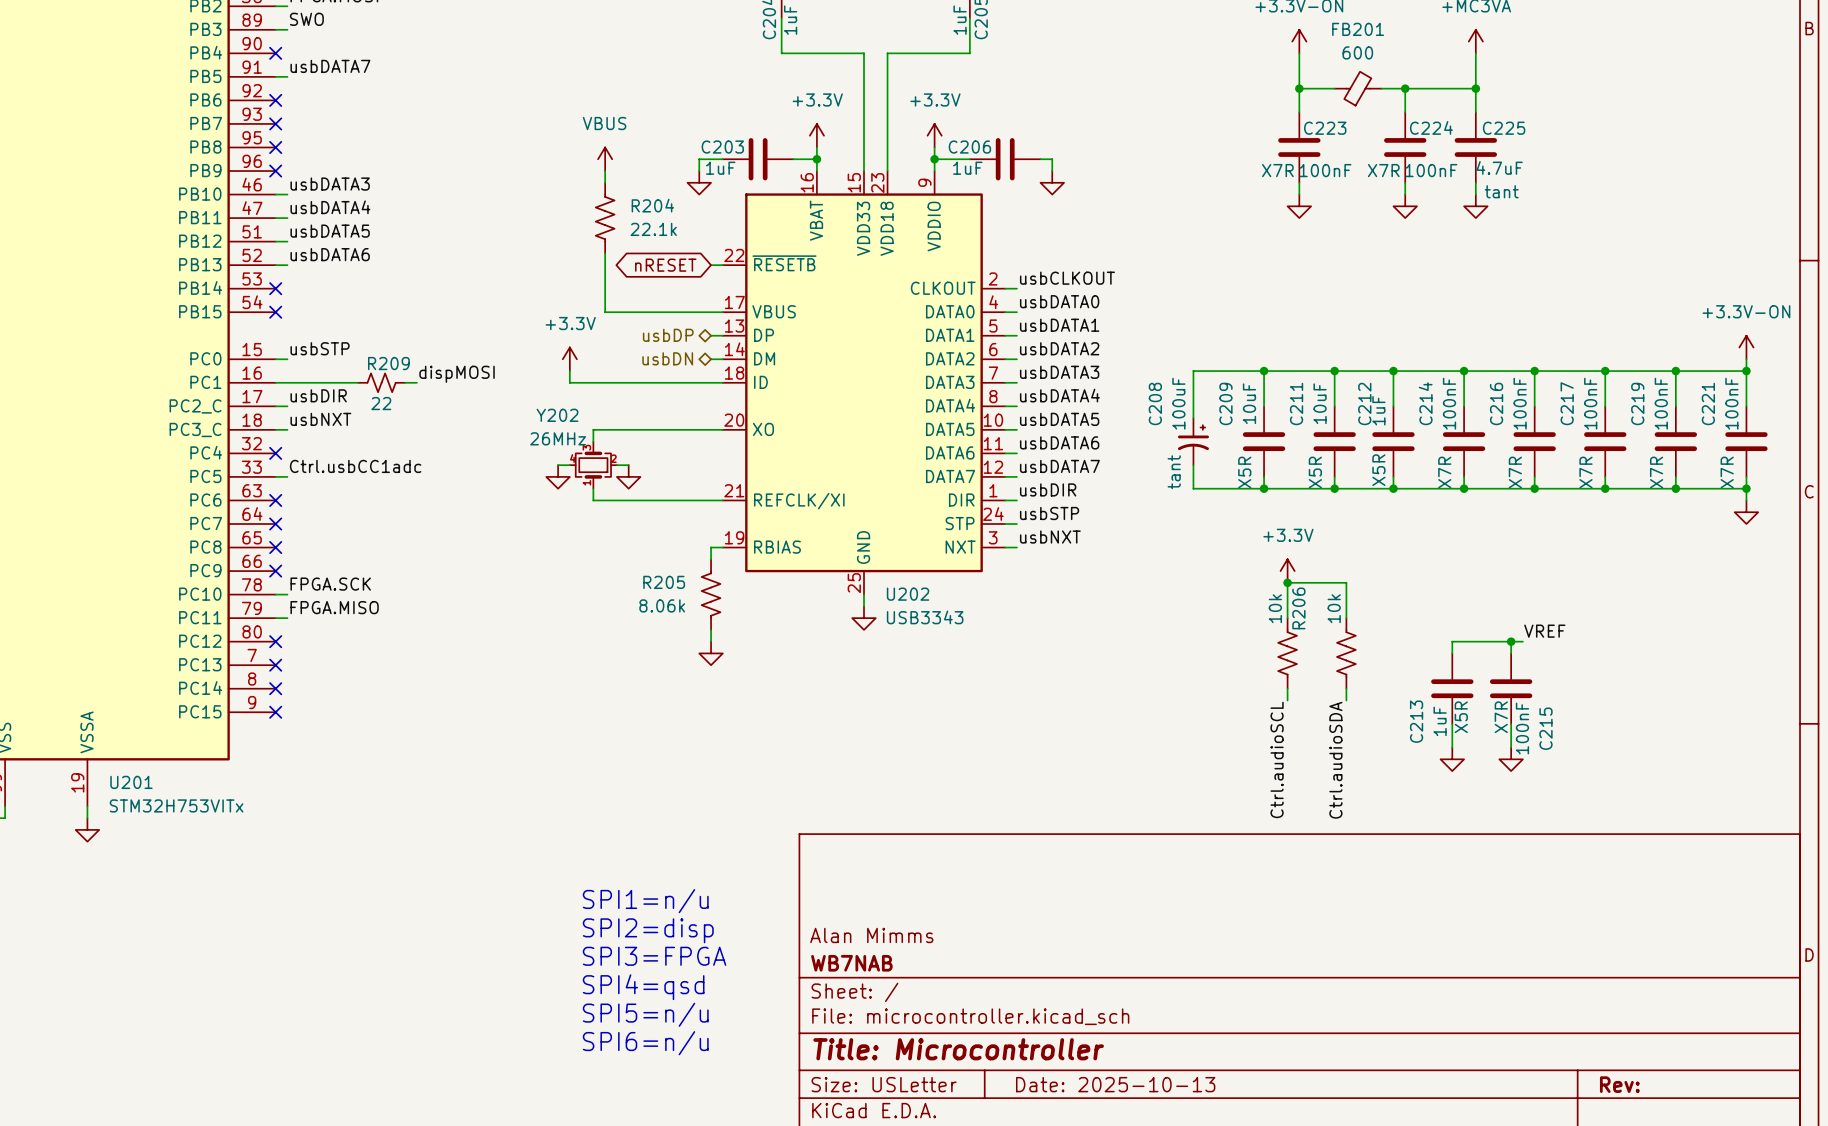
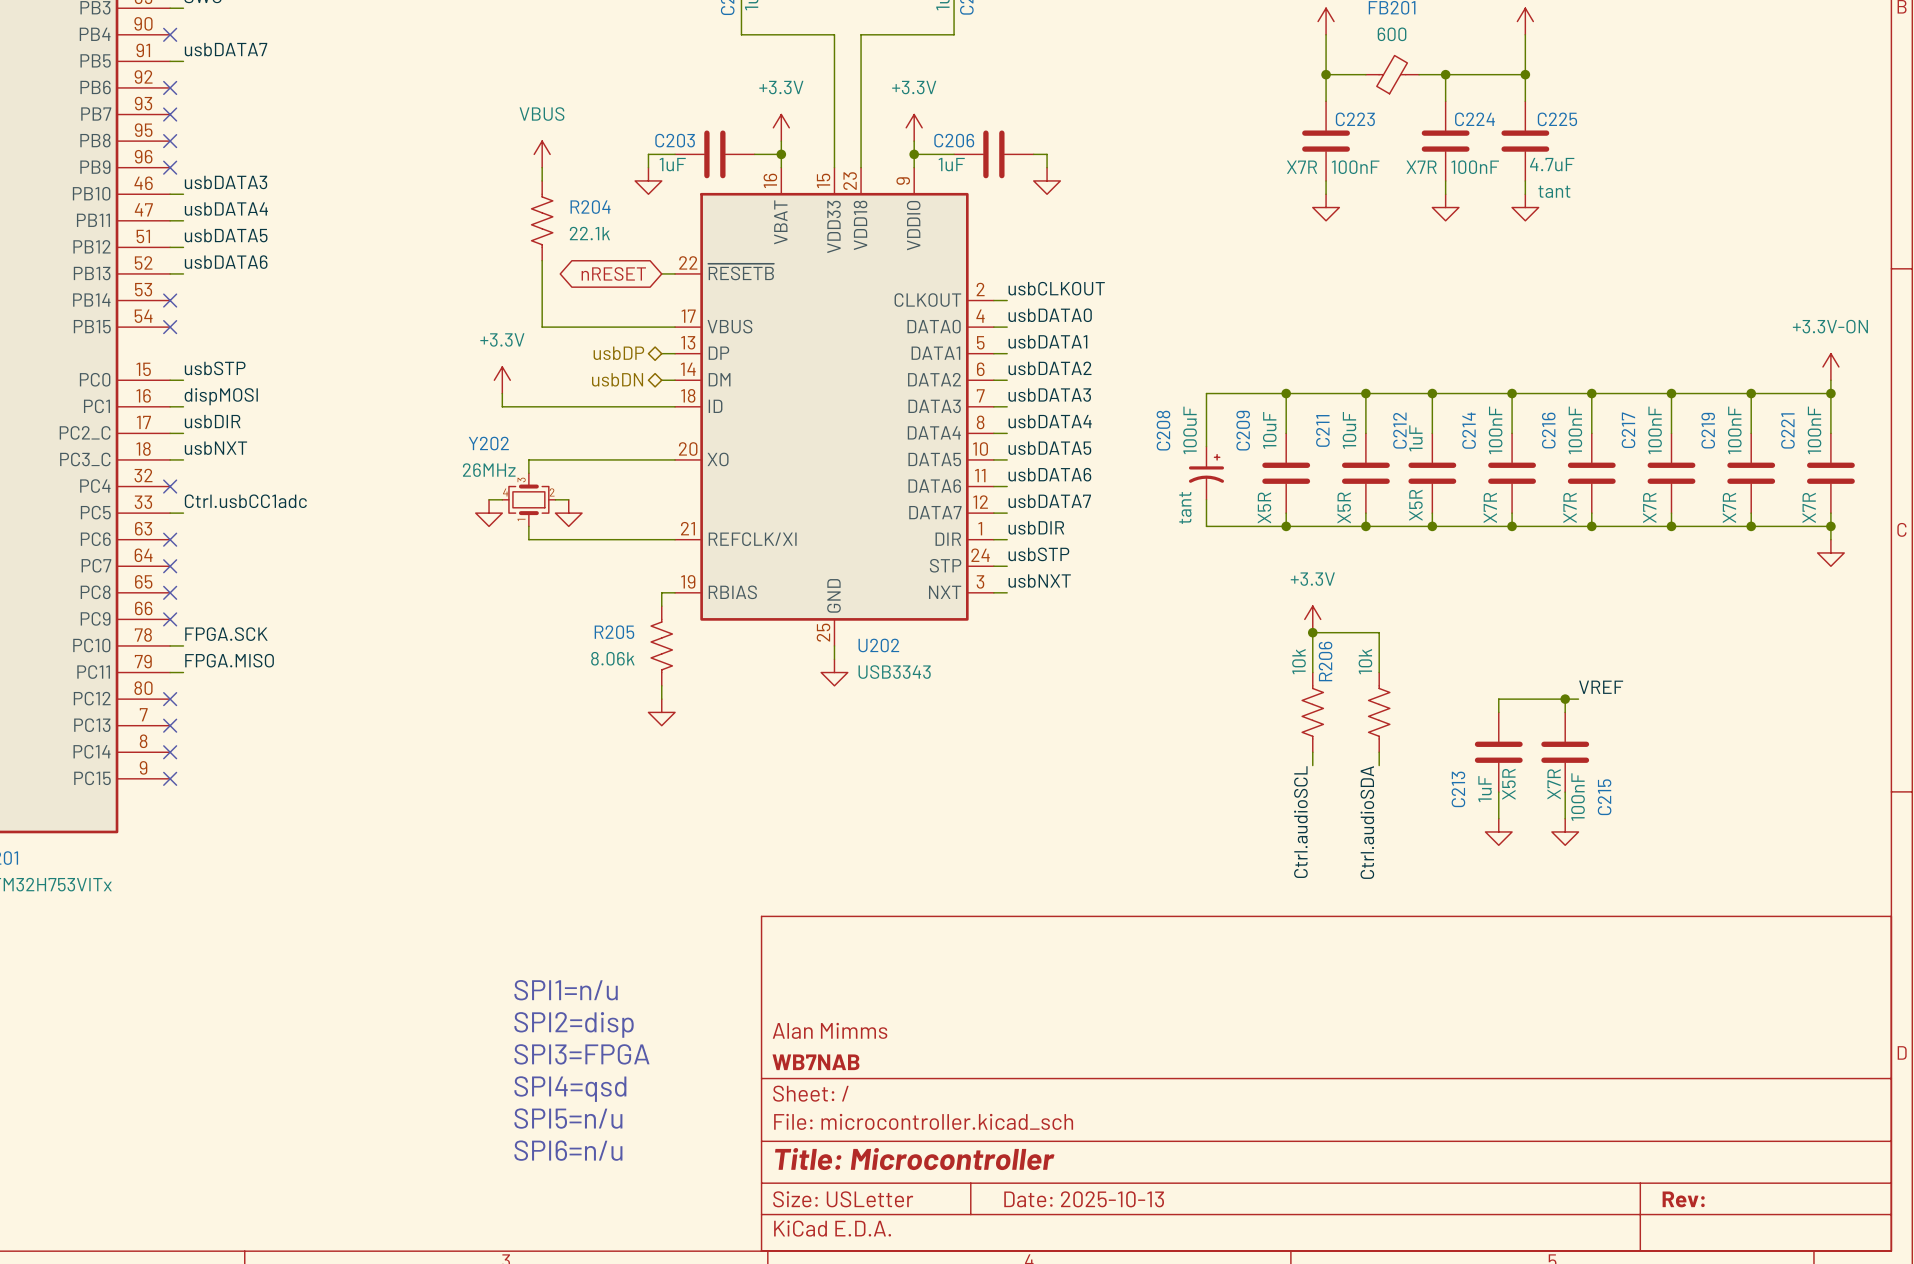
label position: dispMOSI (457, 374) -> dispMOSI (221, 396)
wire: (287, 382) (358, 382) -> none
R209: 22 (381, 382) -> none
wire: (405, 382) (416, 382) -> none

